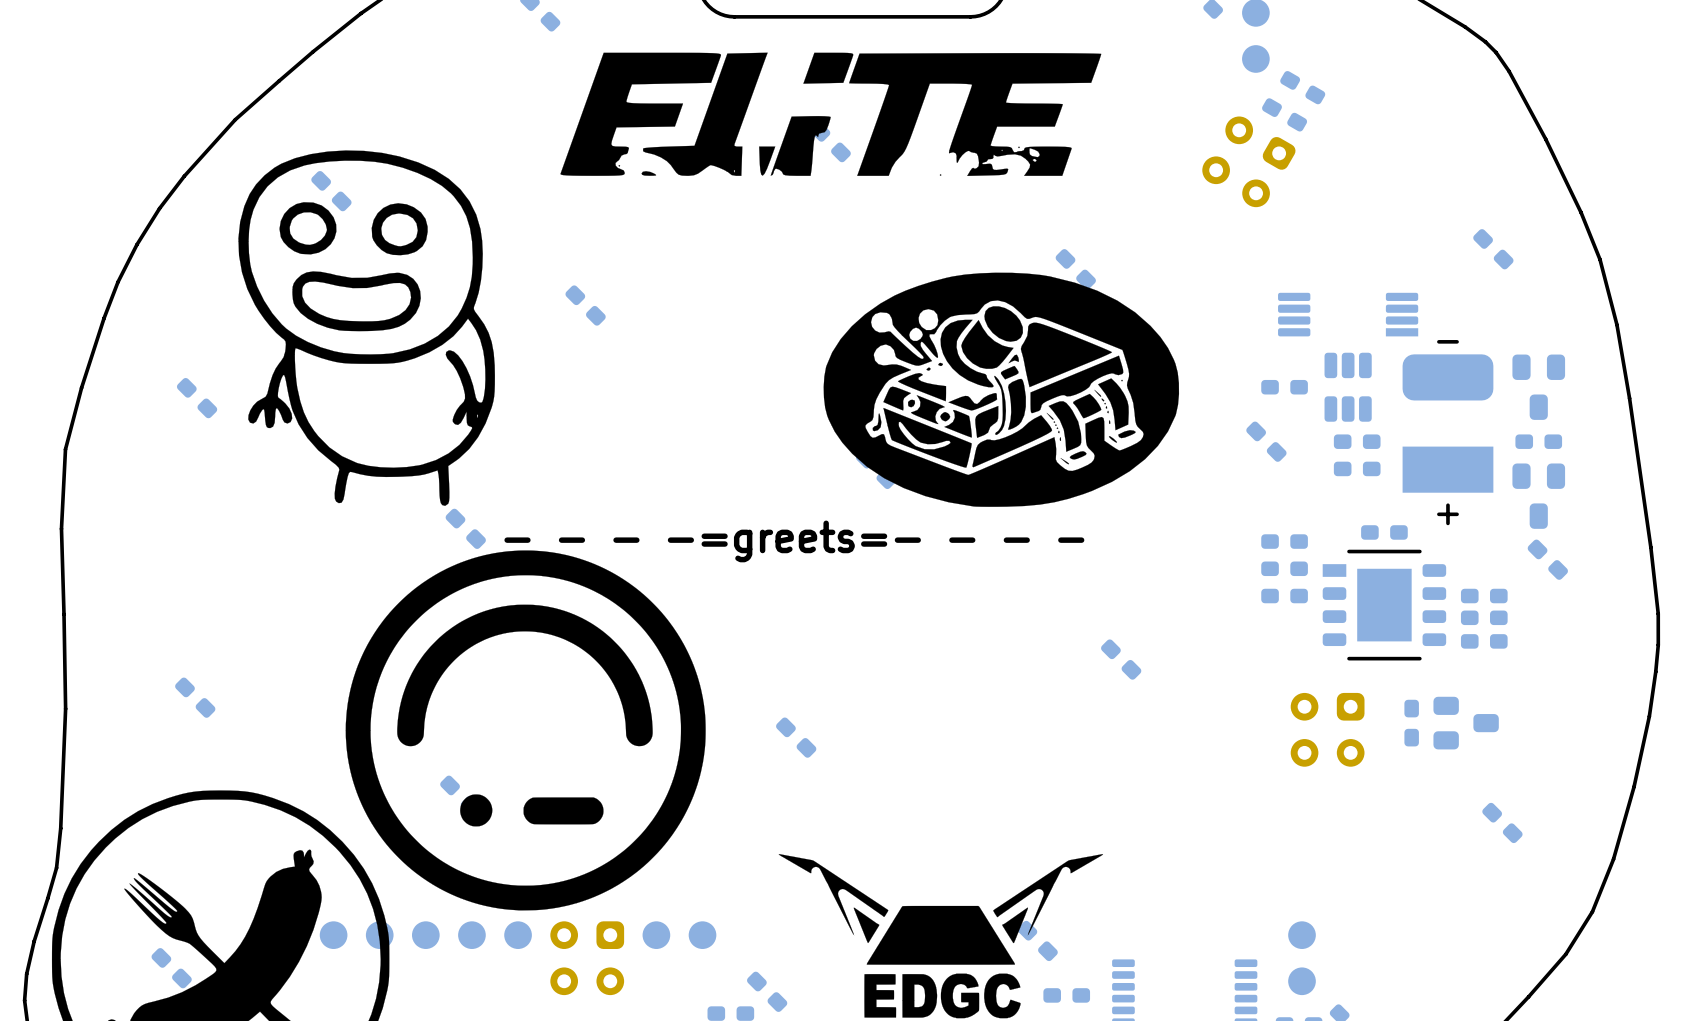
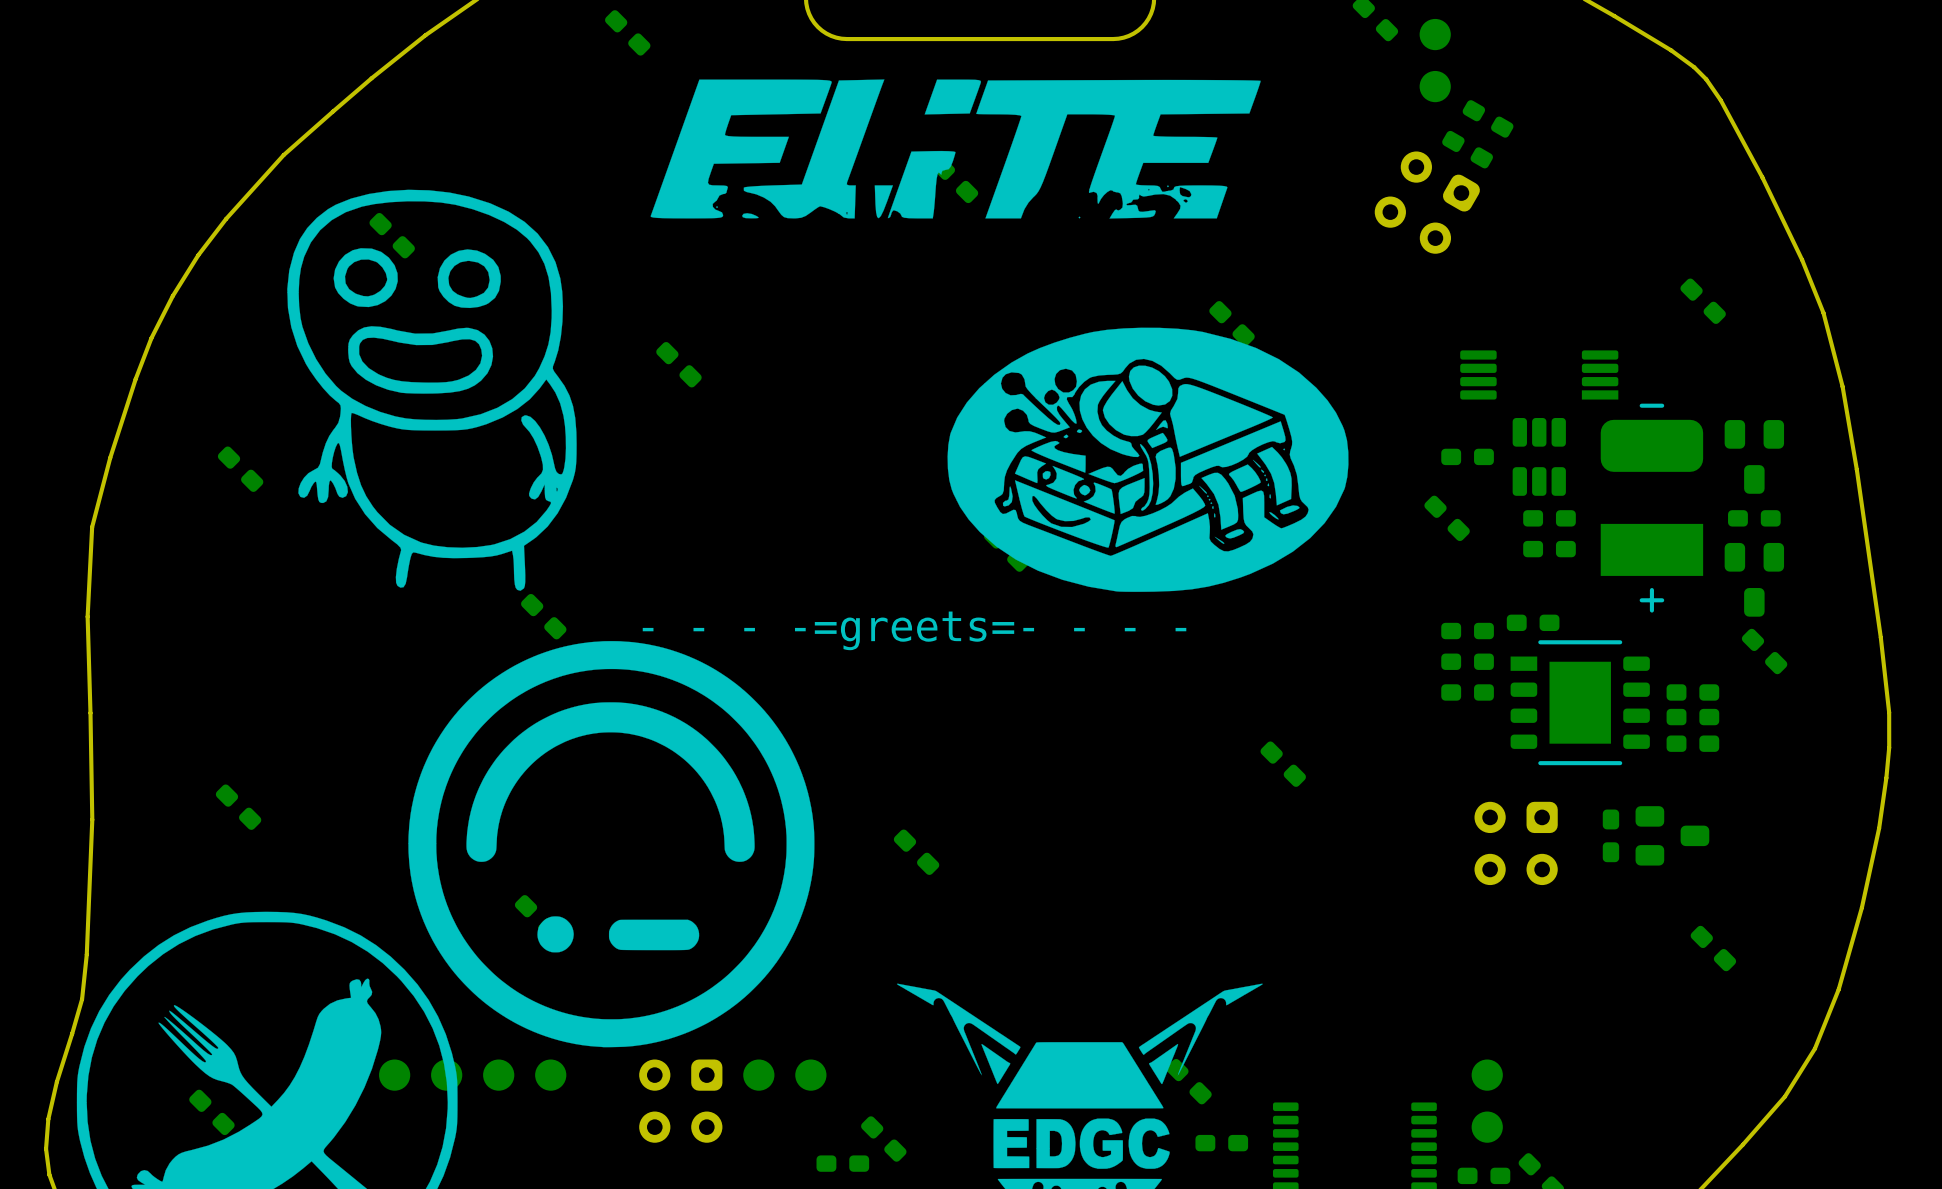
part position: (1384, 532) -> (1533, 622)
part: (518, 935) -> none

